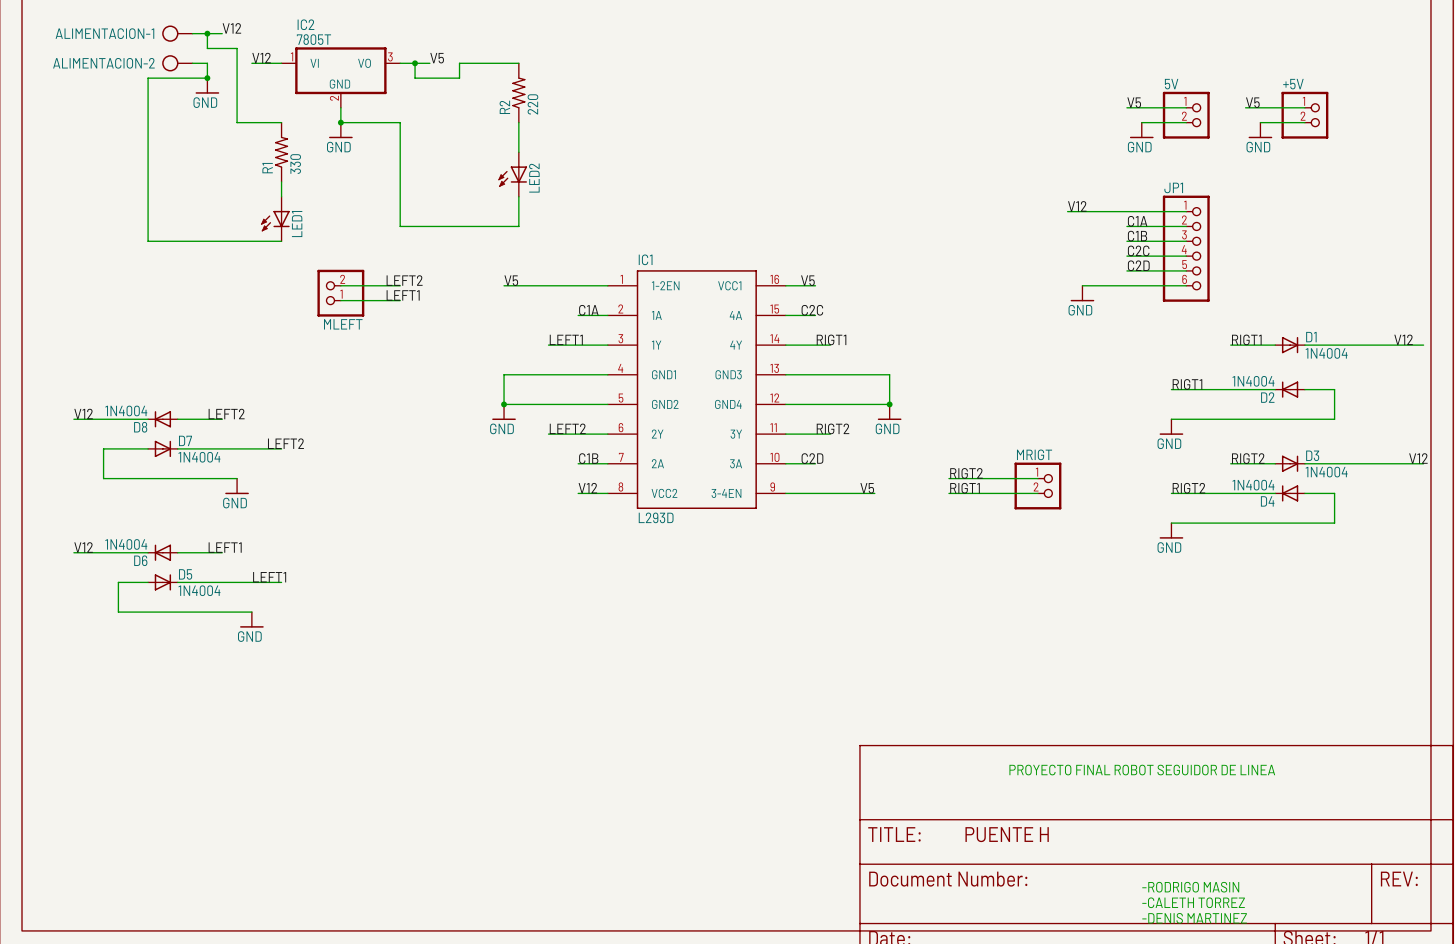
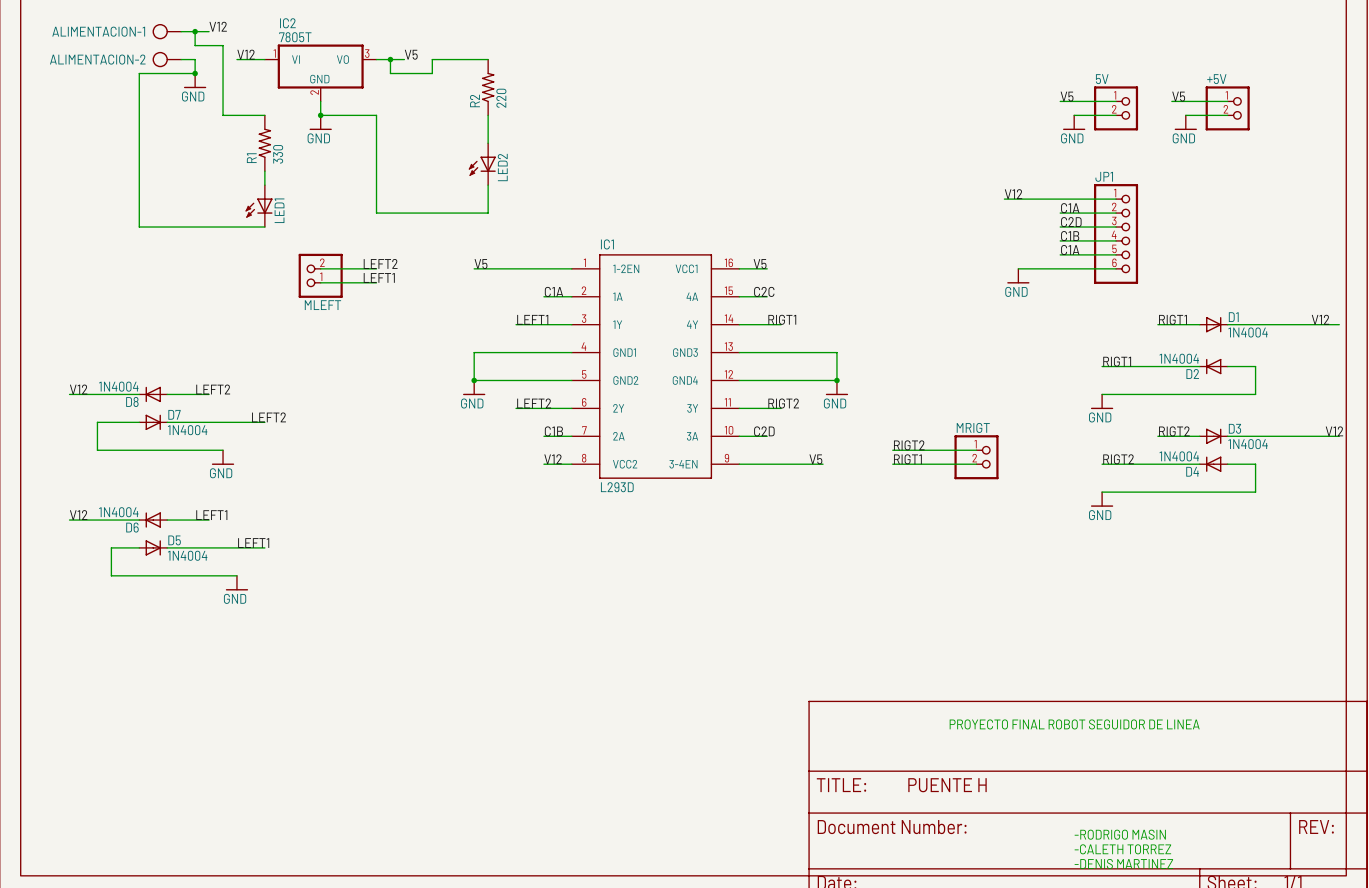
label: C1B (1137, 236) -> C2D (1071, 222)
label: C2C (1138, 250) -> C1B (1070, 236)
label: C2D (1138, 265) -> C1A (1070, 250)

